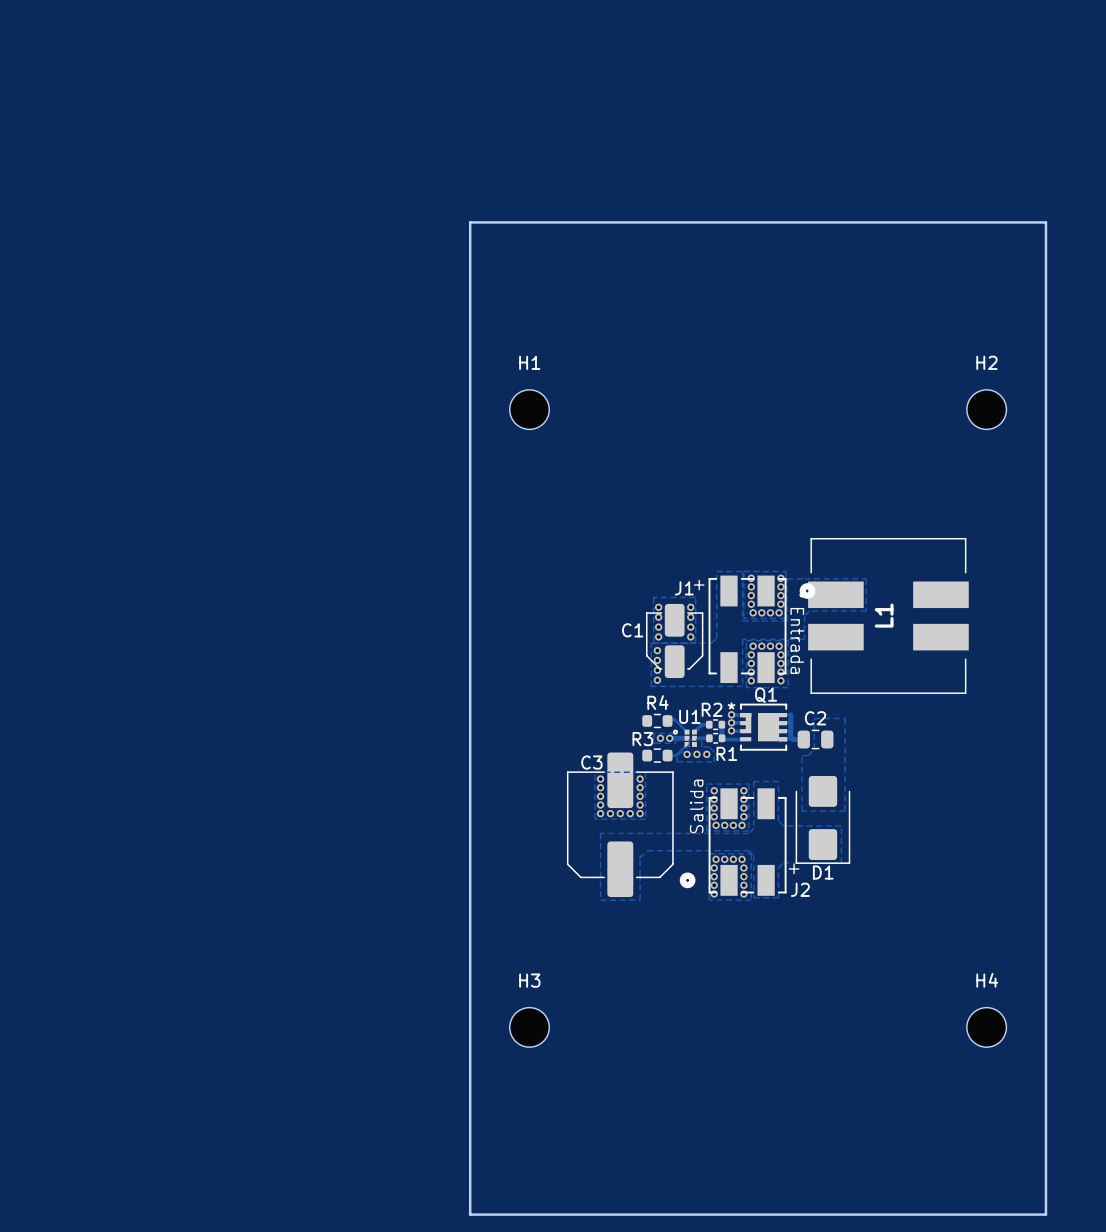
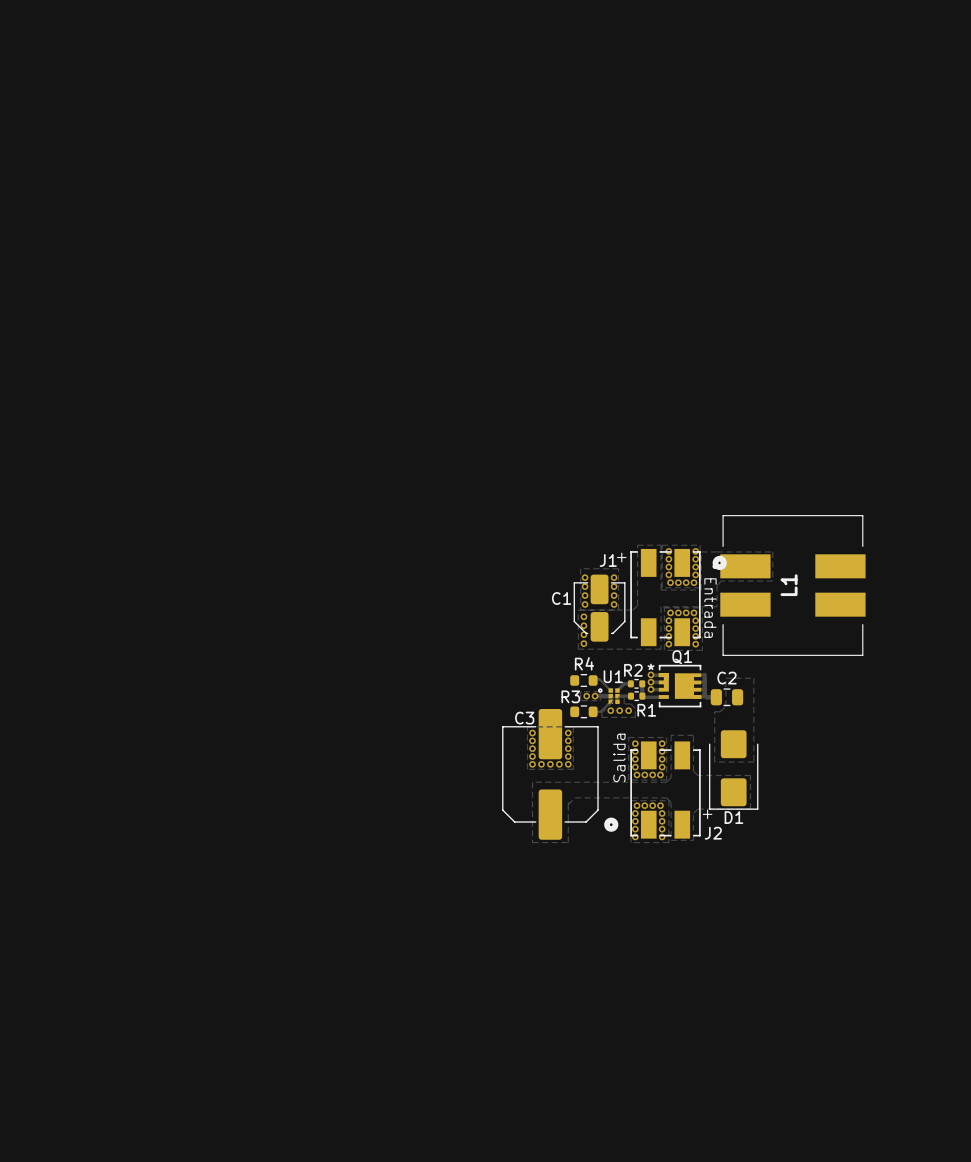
board edge: (470, 222) (1045, 222) (1045, 1214) (470, 1214) (470, 222) -> none
H1: (529, 409) -> none
H2: (986, 409) -> none
H3: (529, 1027) -> none
H4: (986, 1027) -> none

